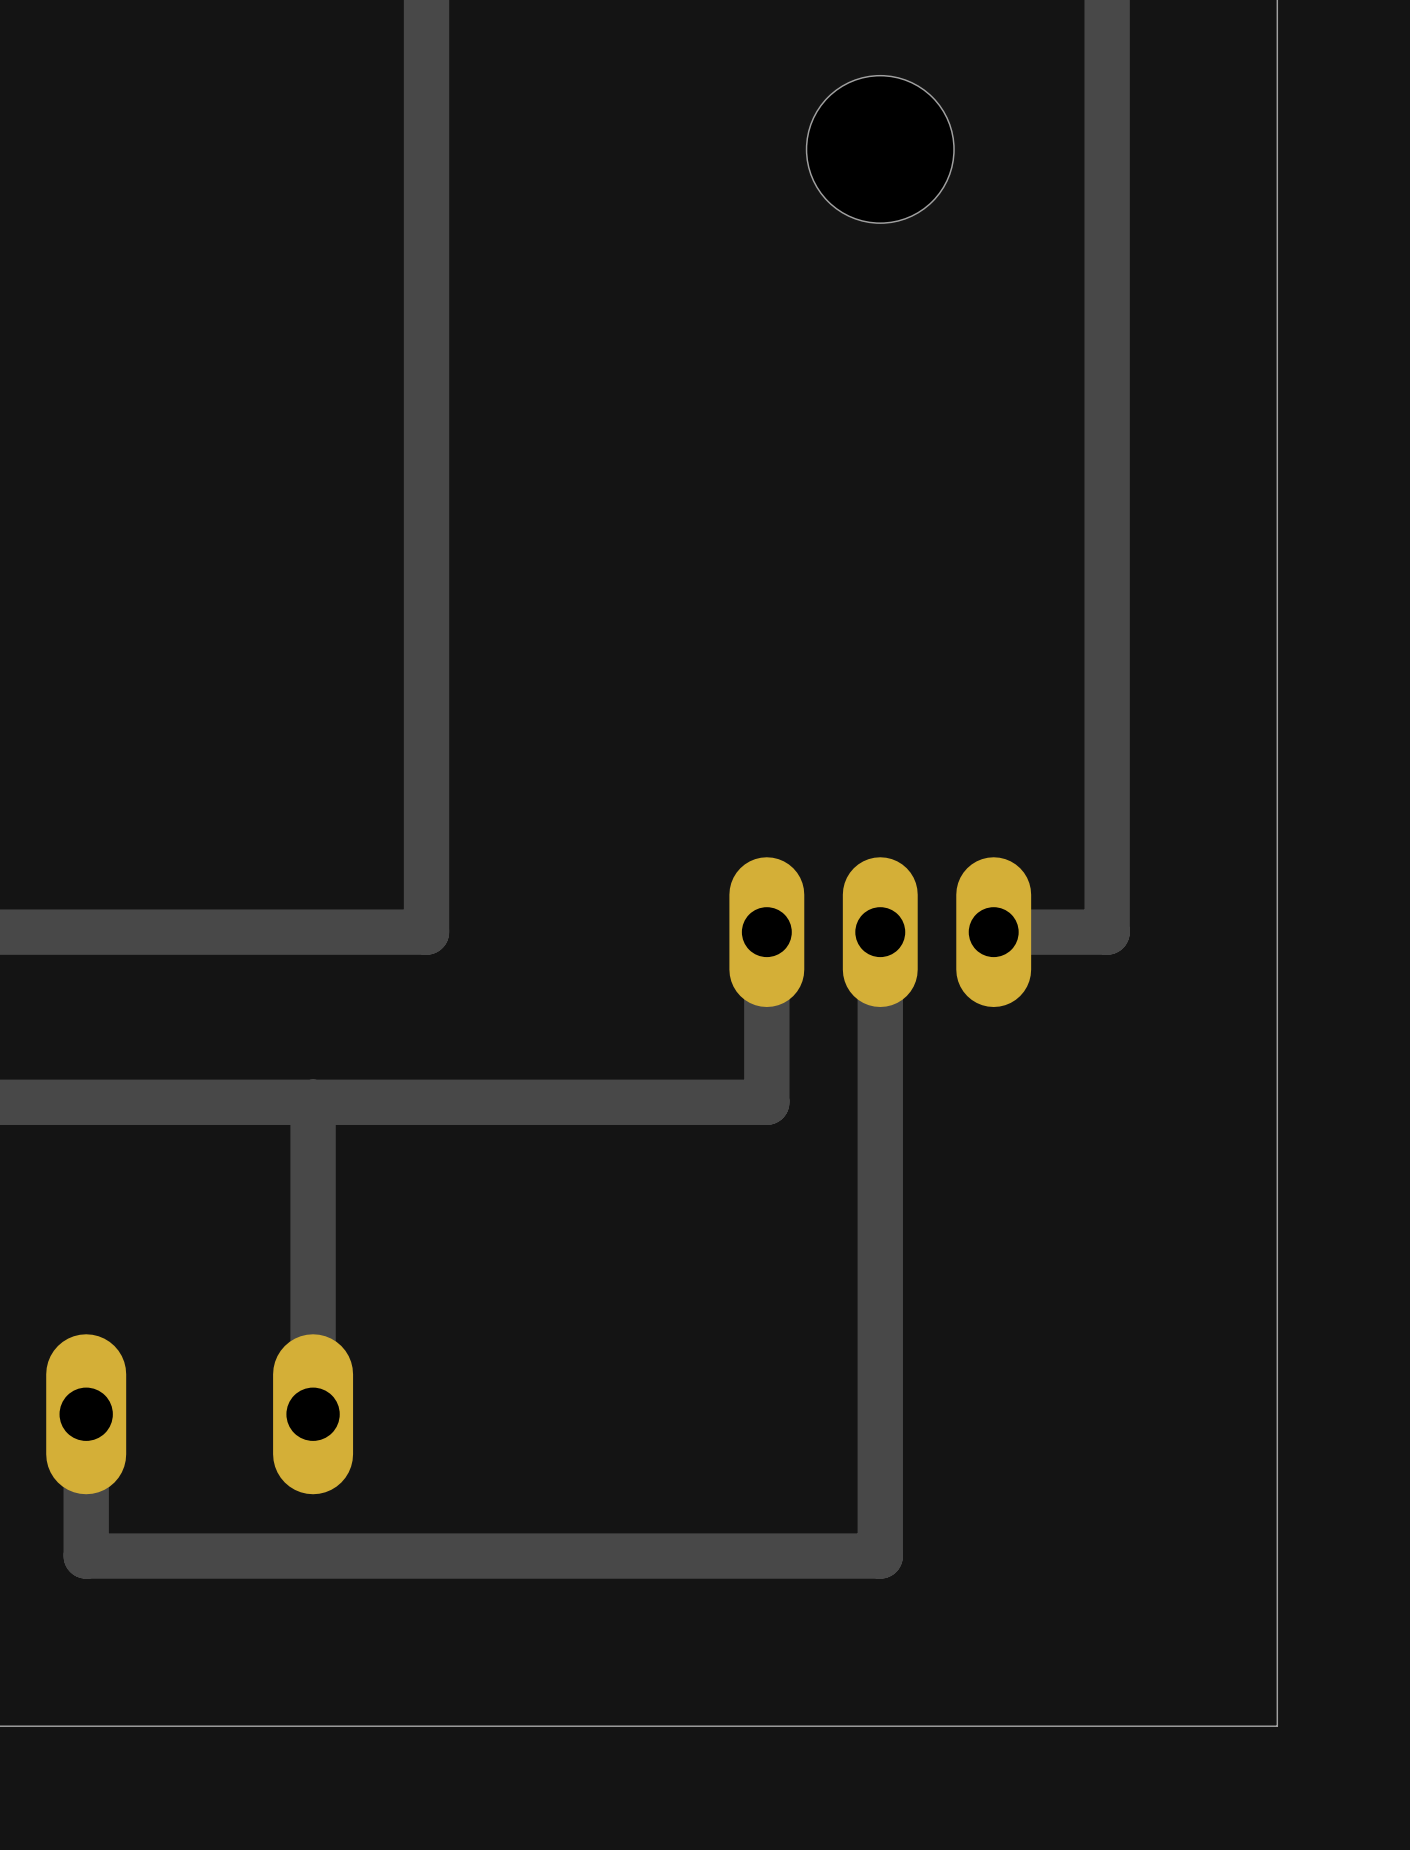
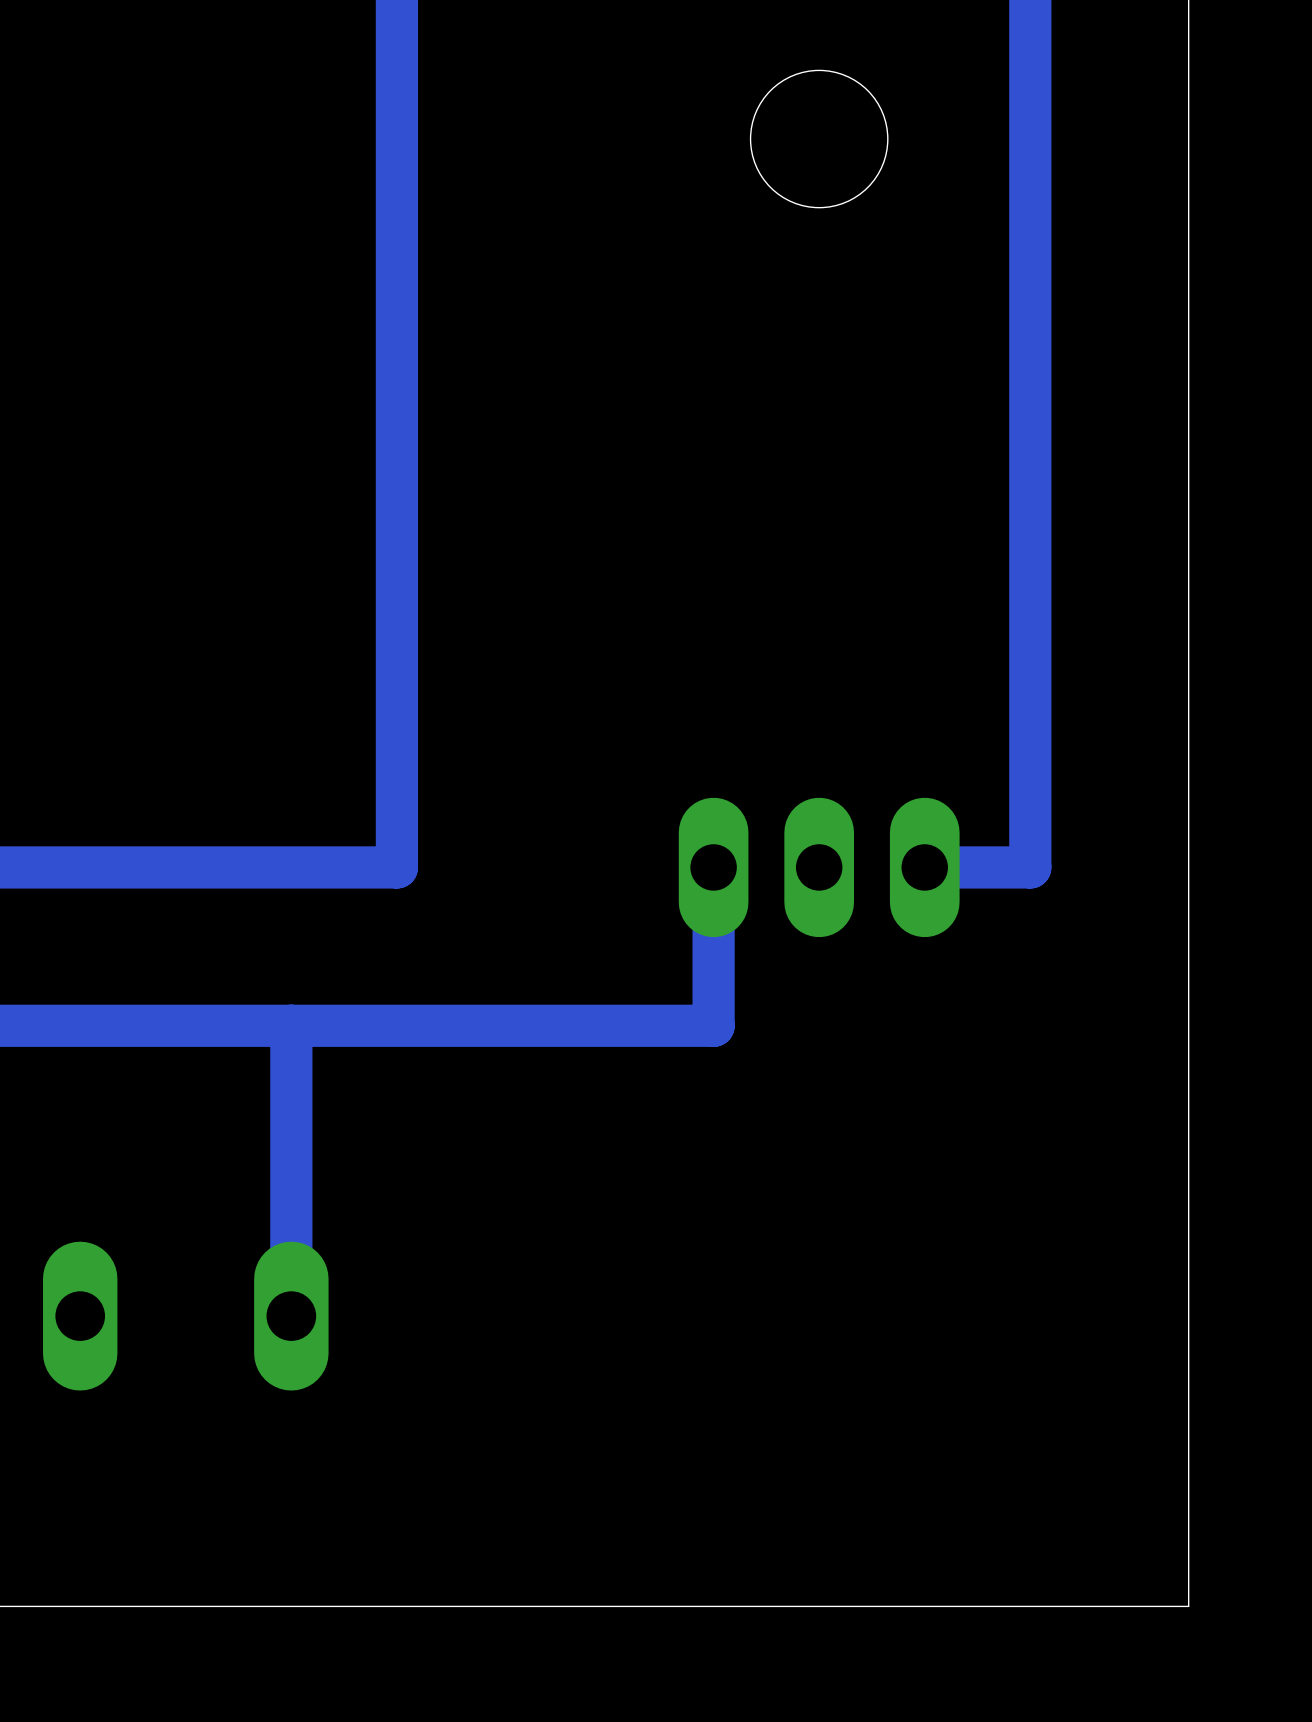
track: (880, 932) (880, 1556) (86, 1556) (86, 1414) -> none

